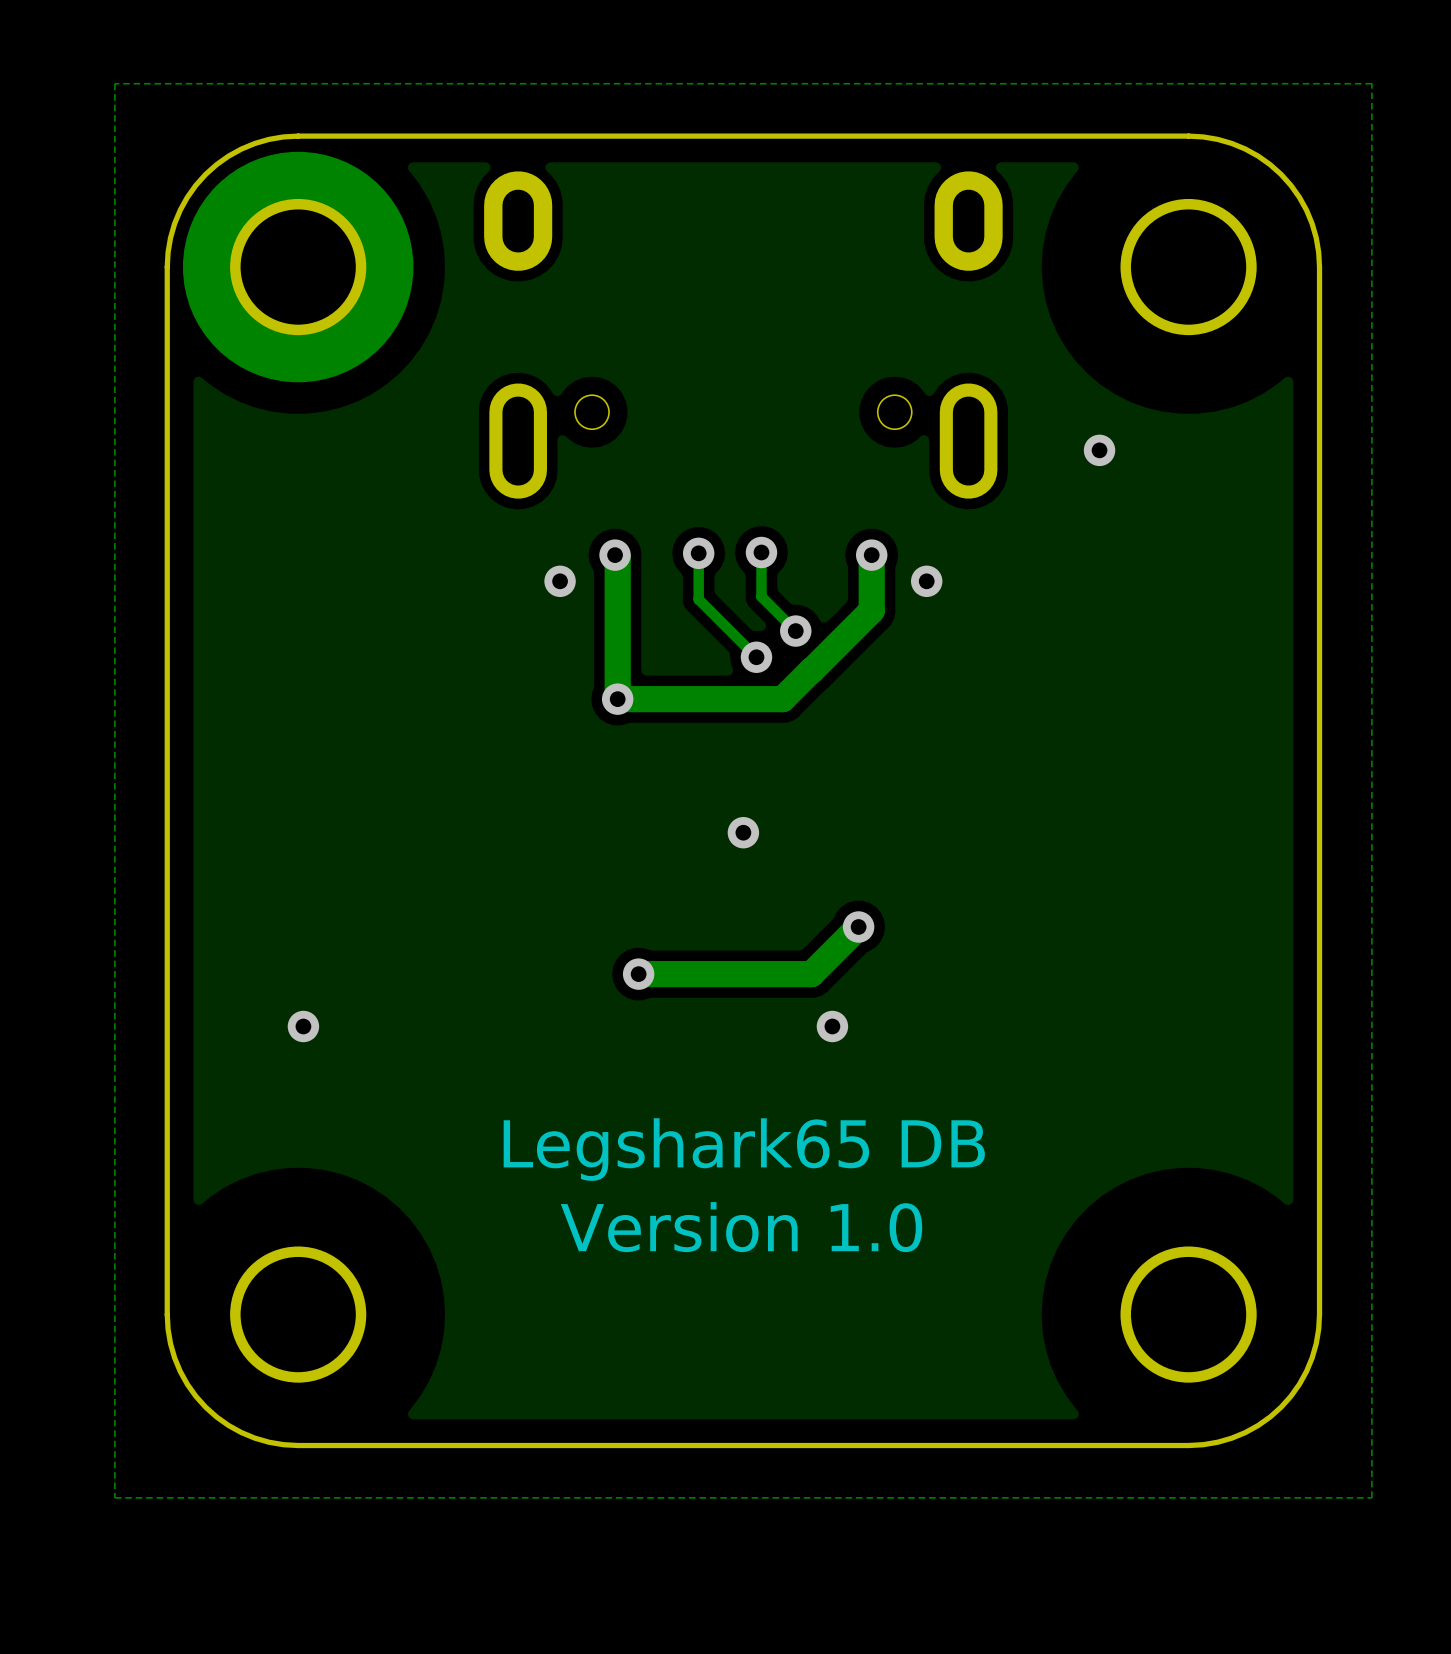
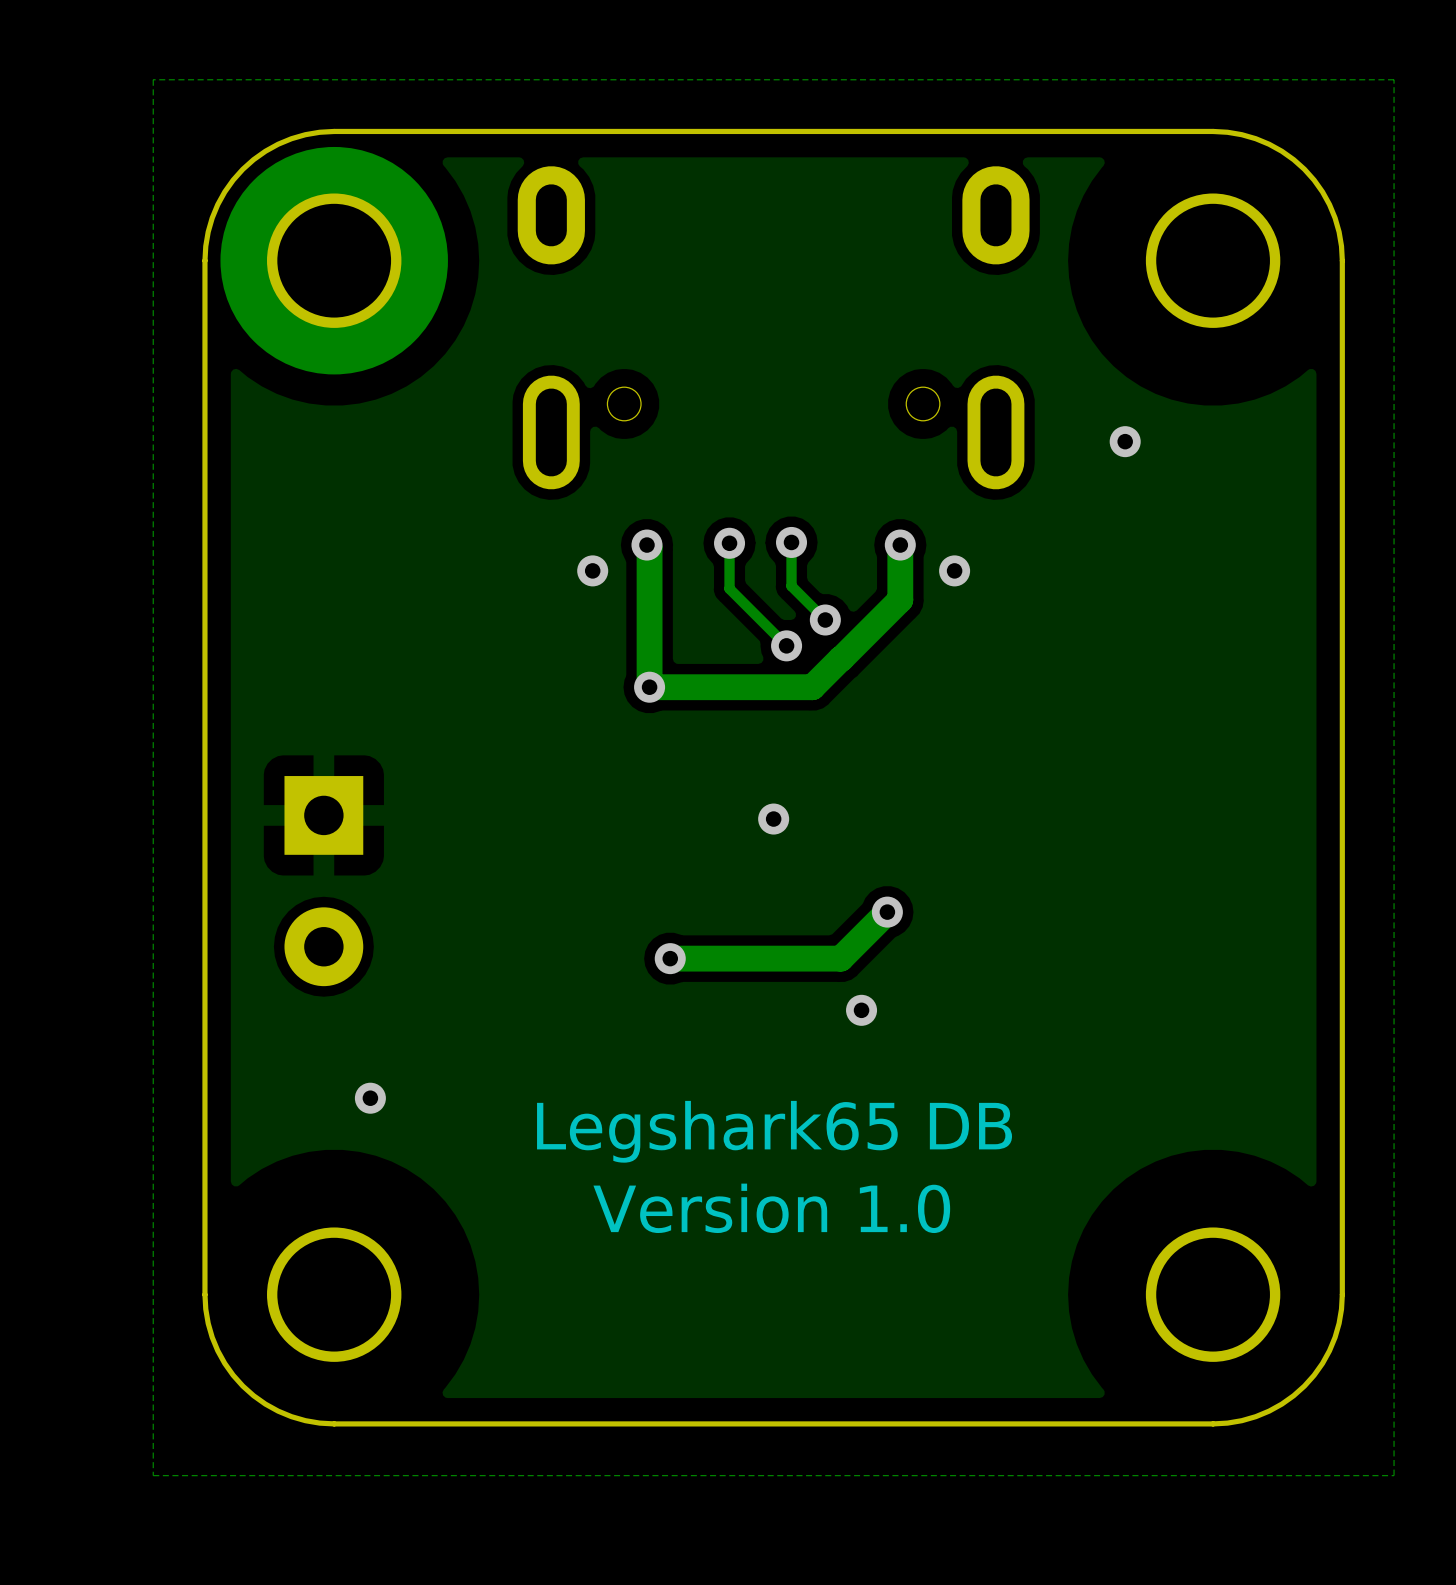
part: none -> (323, 881)
via position: (303, 1026) -> (370, 1098)

